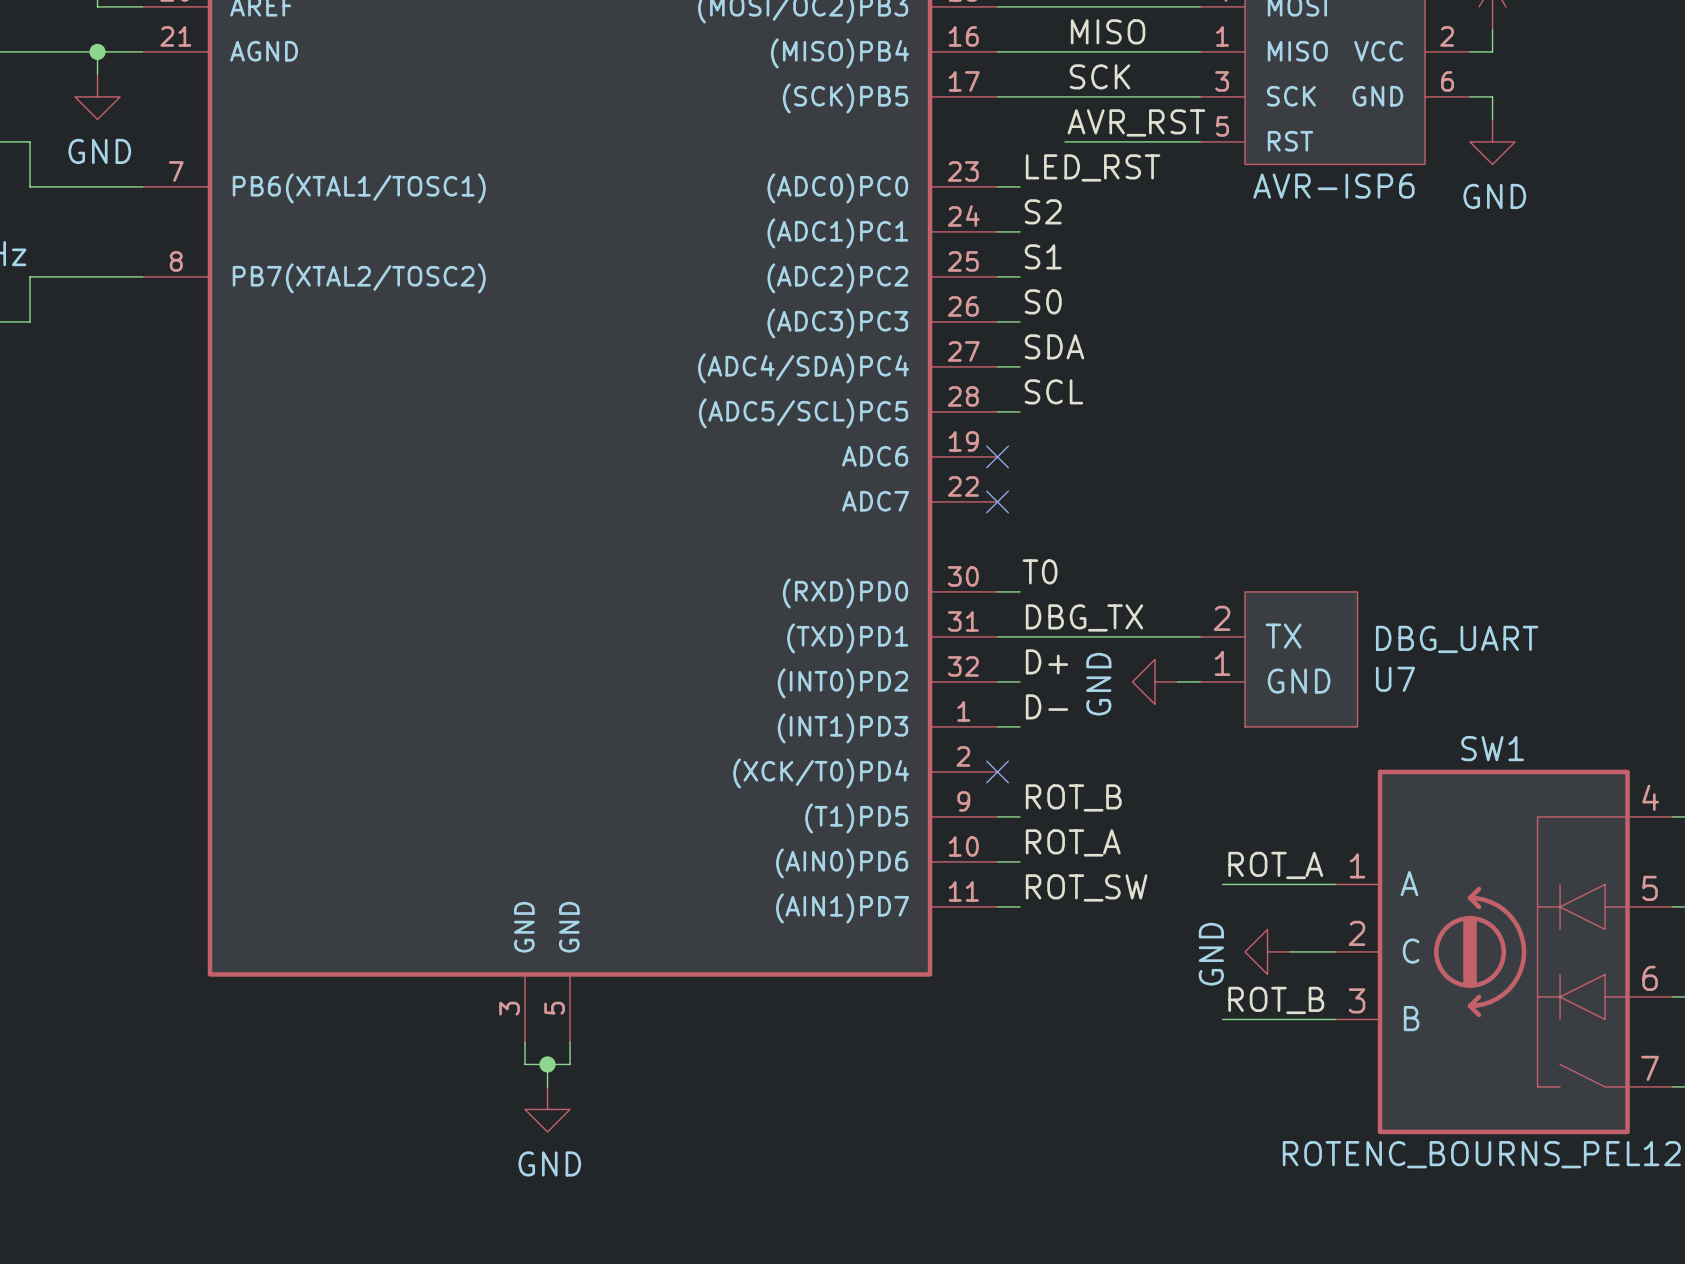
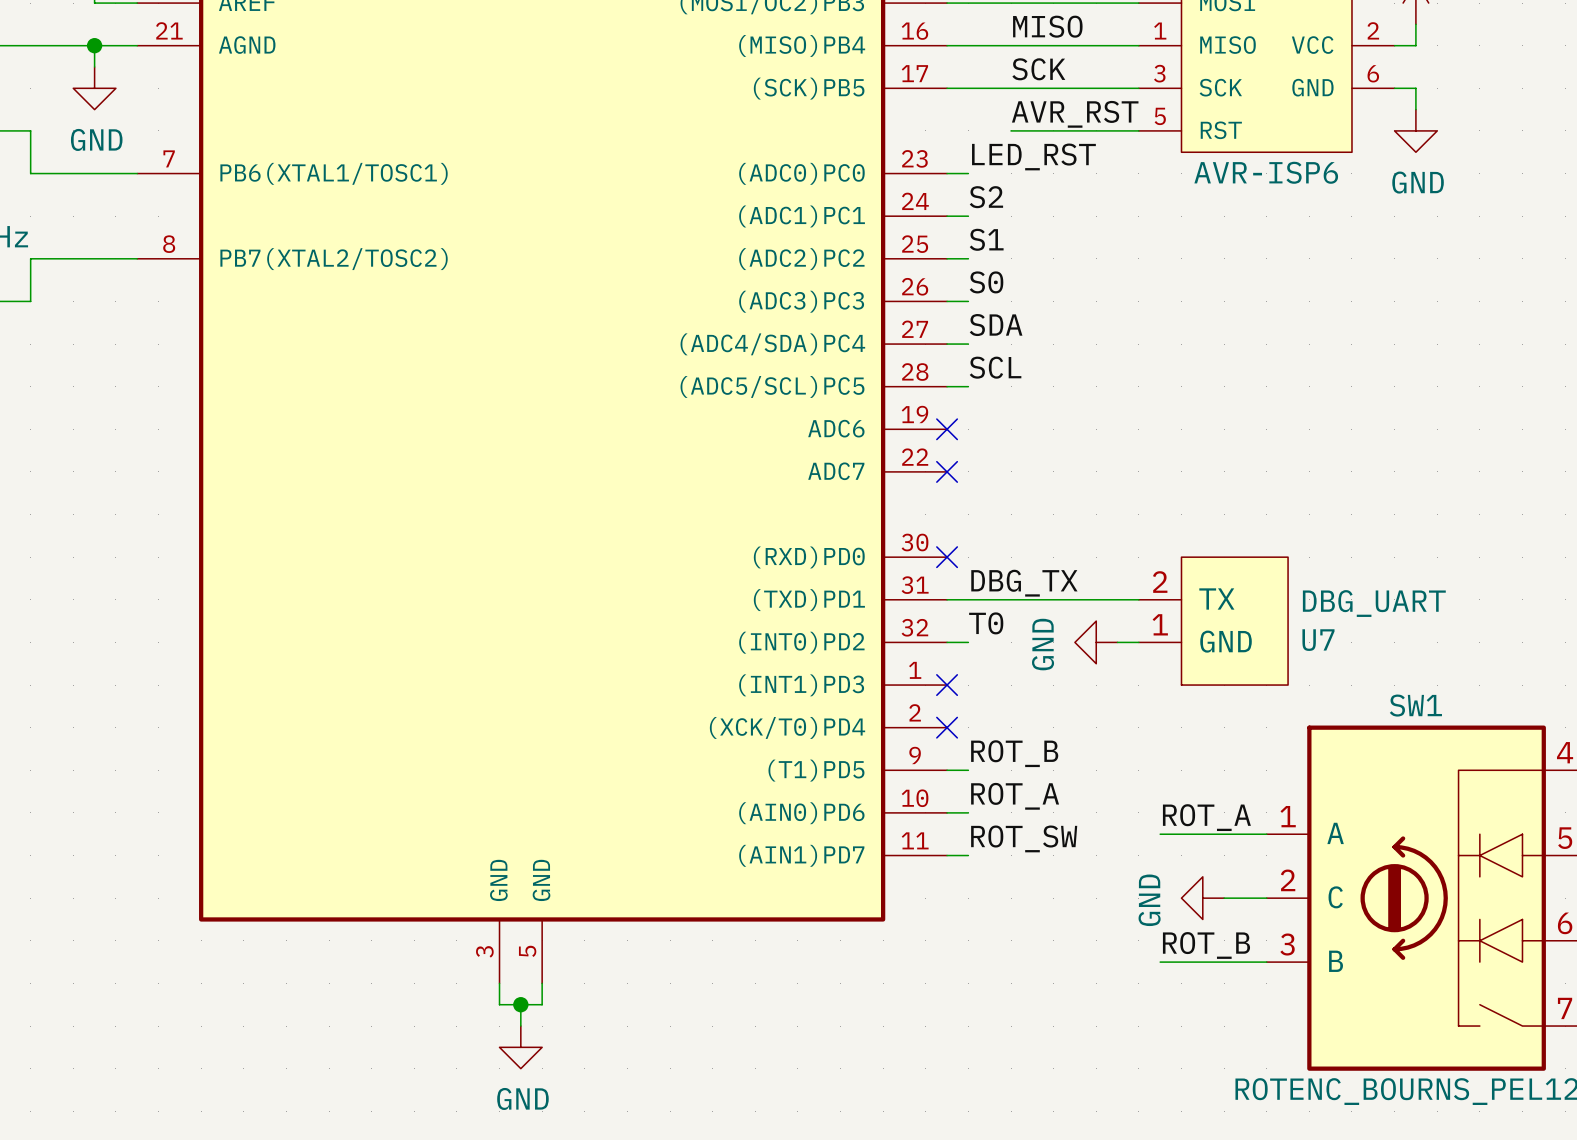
label: T0 (1040, 571) -> none
wire: (997, 591) (1020, 591) -> none
no-connect mark: none -> (947, 557)
label: D+ (1046, 661) -> T0 (986, 623)
label: D- (1046, 706) -> none
wire: (997, 726) (1020, 726) -> none
no-connect mark: none -> (947, 685)

